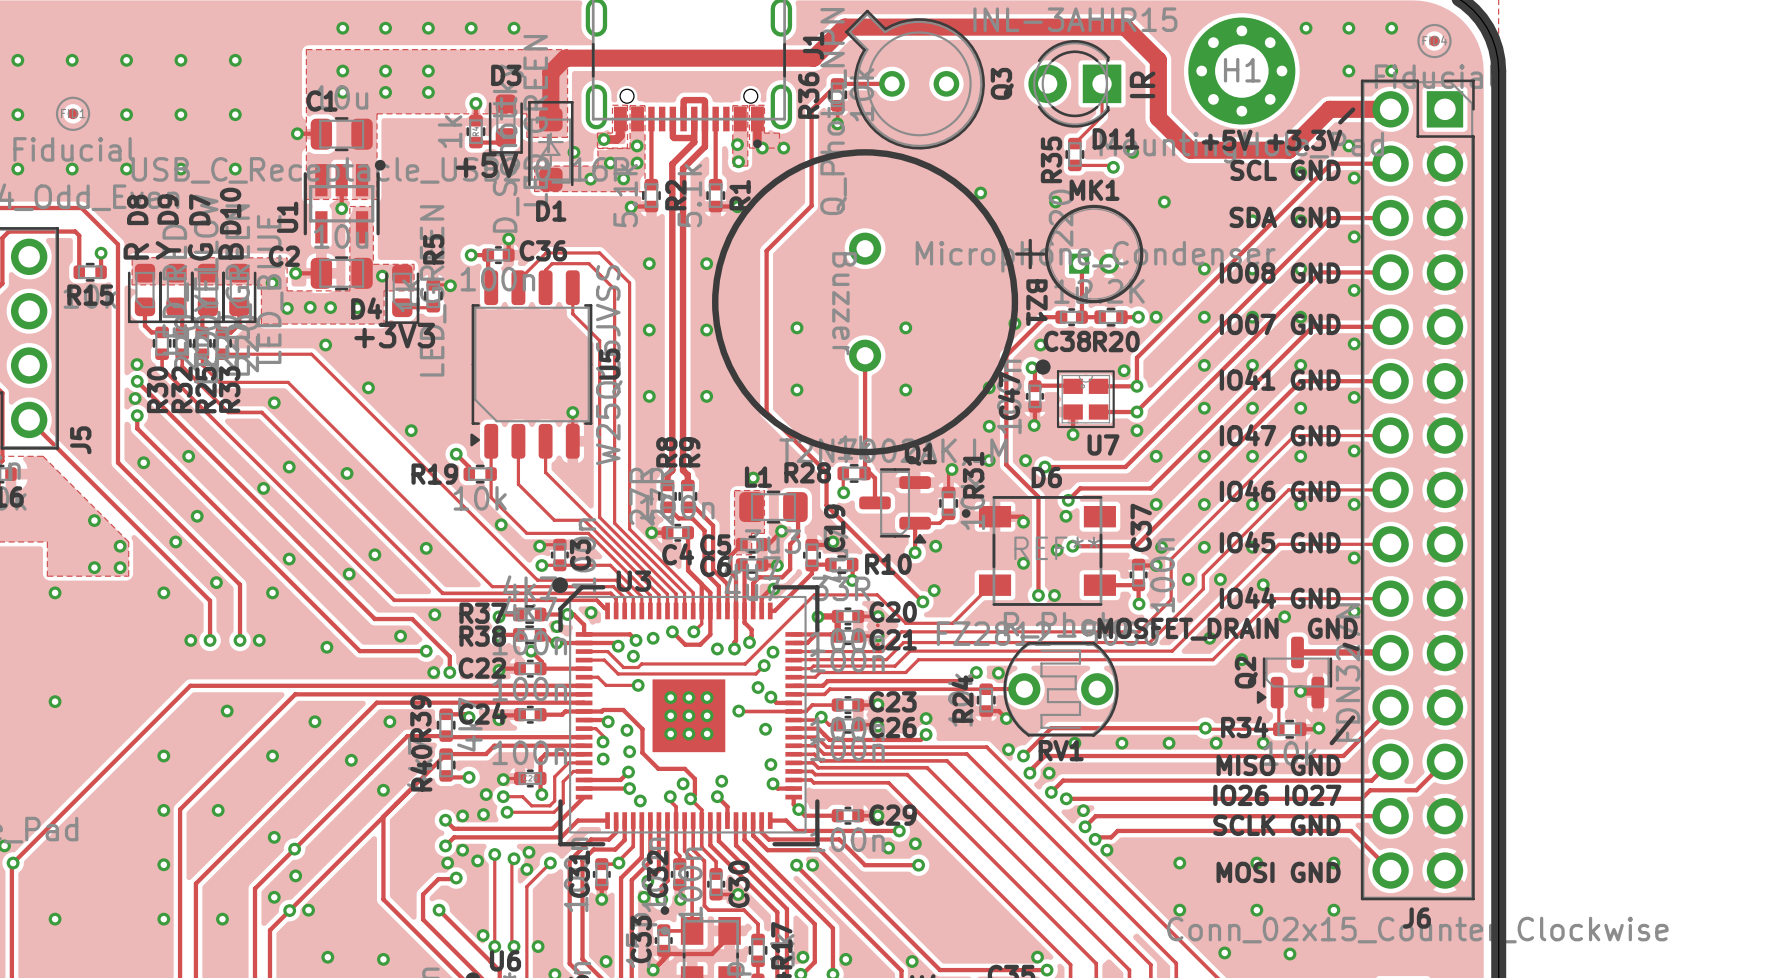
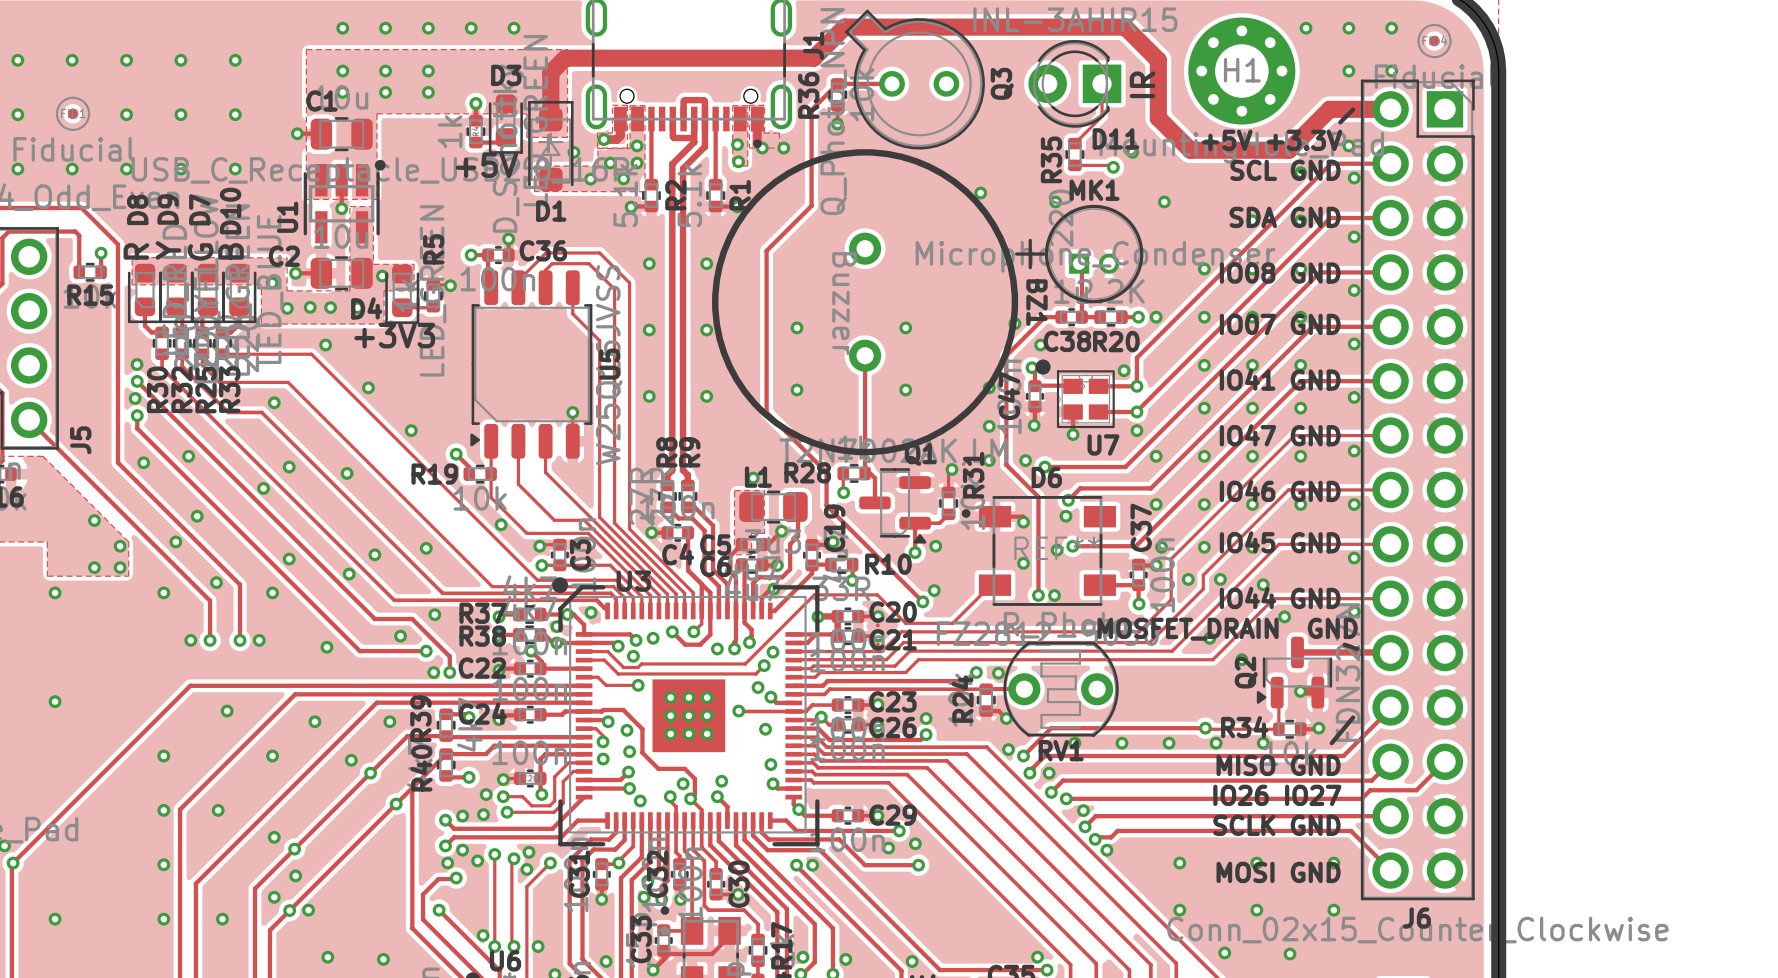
via: none -> (370, 773)
via: (383, 790) -> none
via: none -> (396, 804)
track: (383, 816) (383, 899) (412, 928) -> (412, 787) (412, 928)

